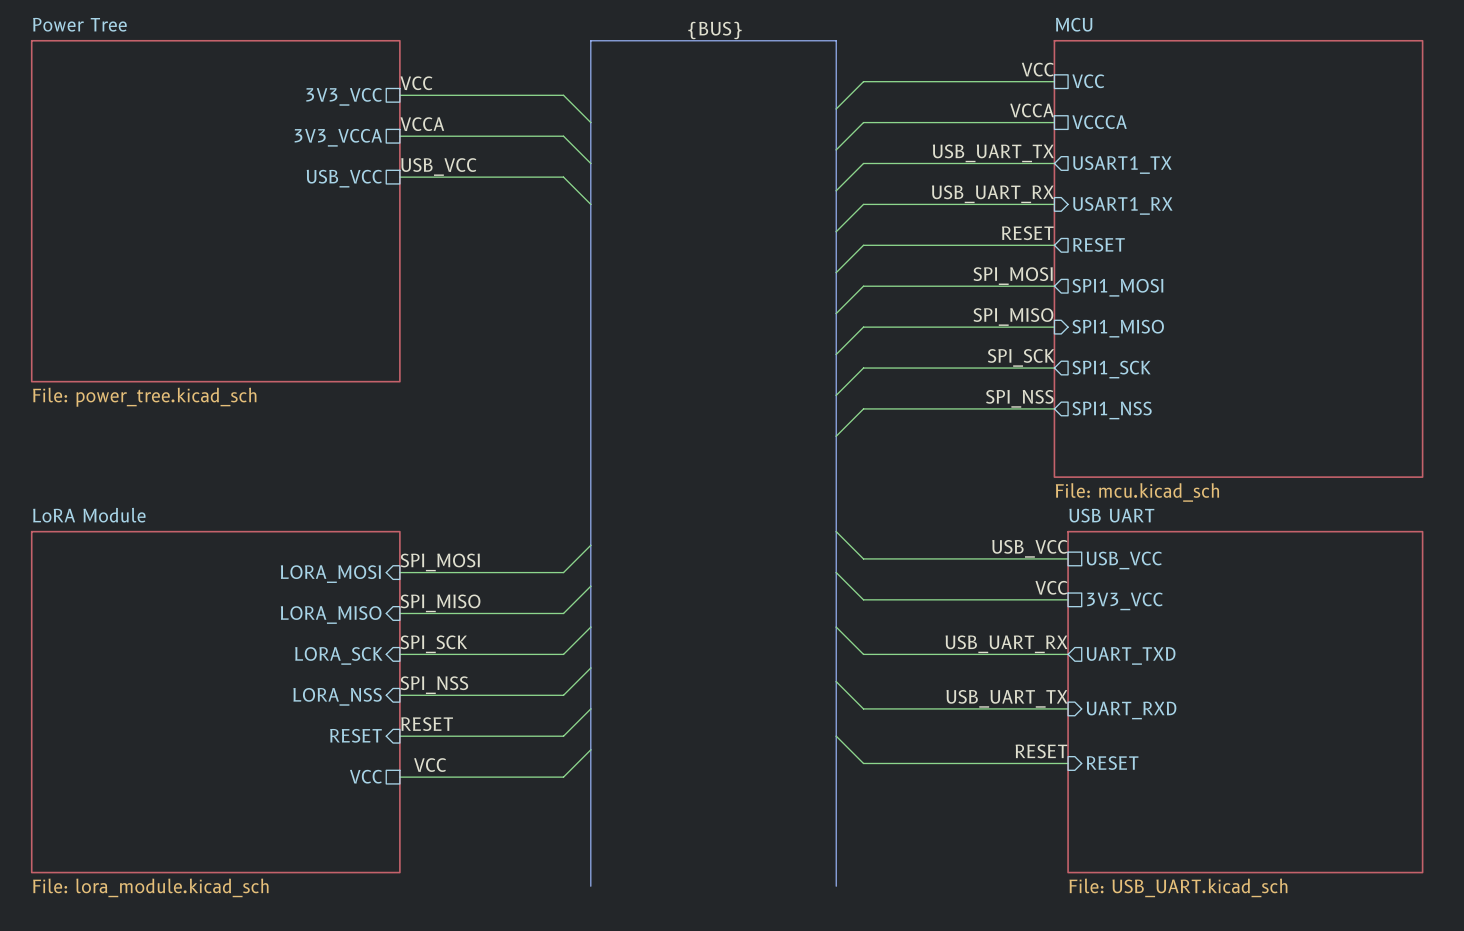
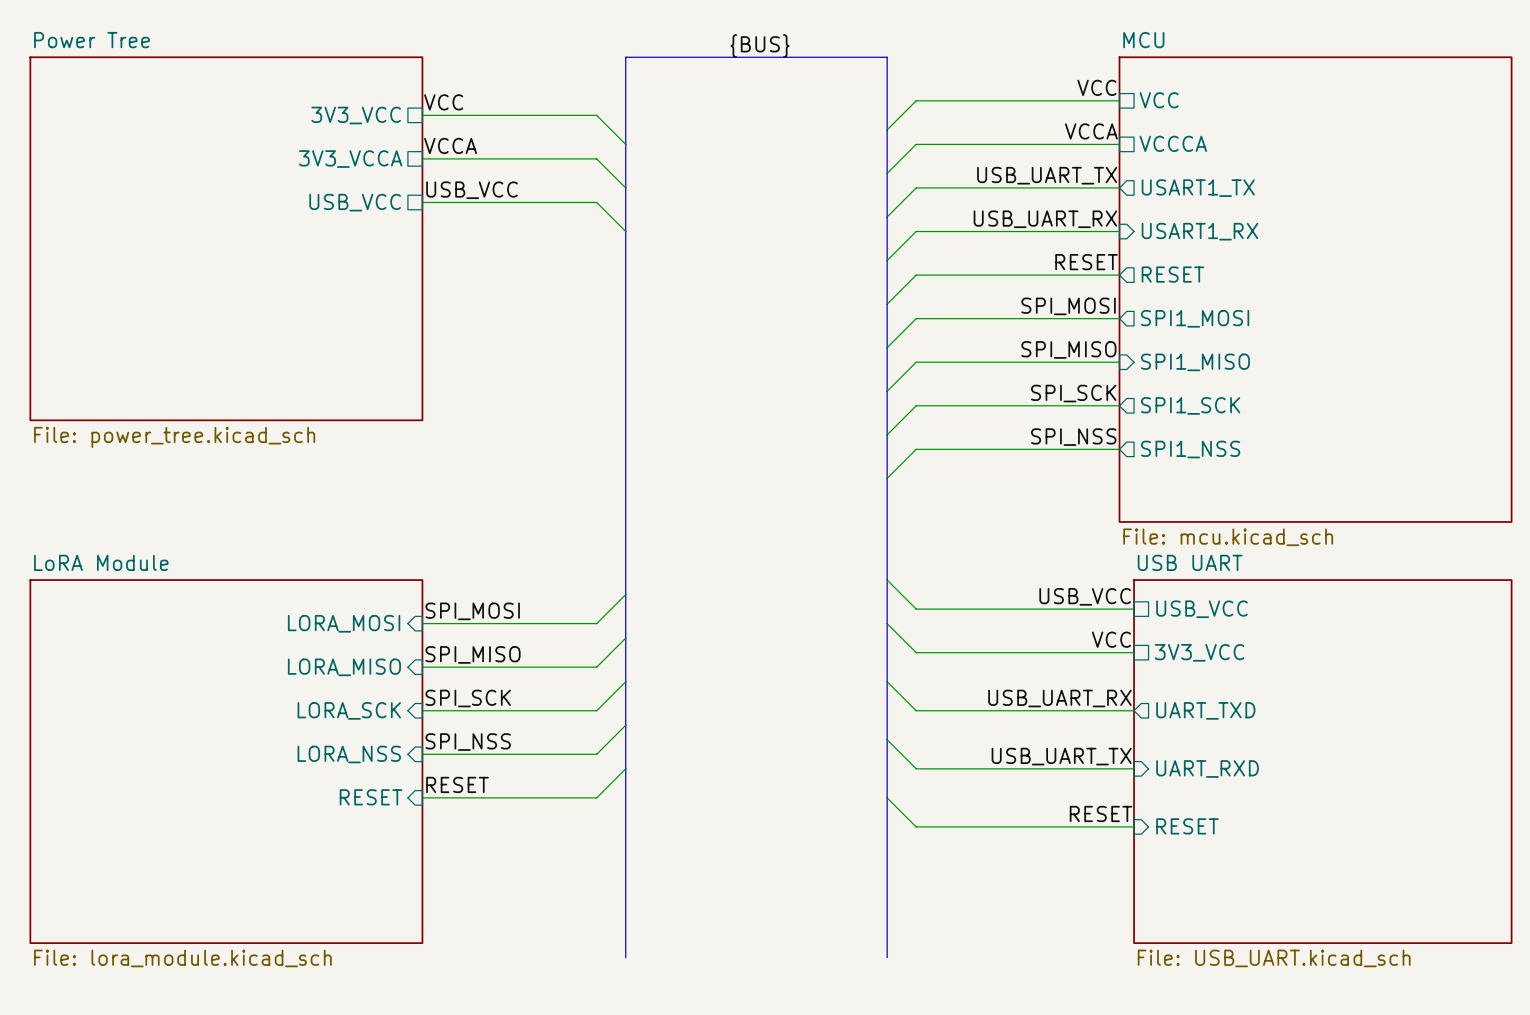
wire: (590, 749) (563, 777) (399, 777) -> none
label: VCC (430, 765) -> none
sheet pin: VCC (365, 776) -> none

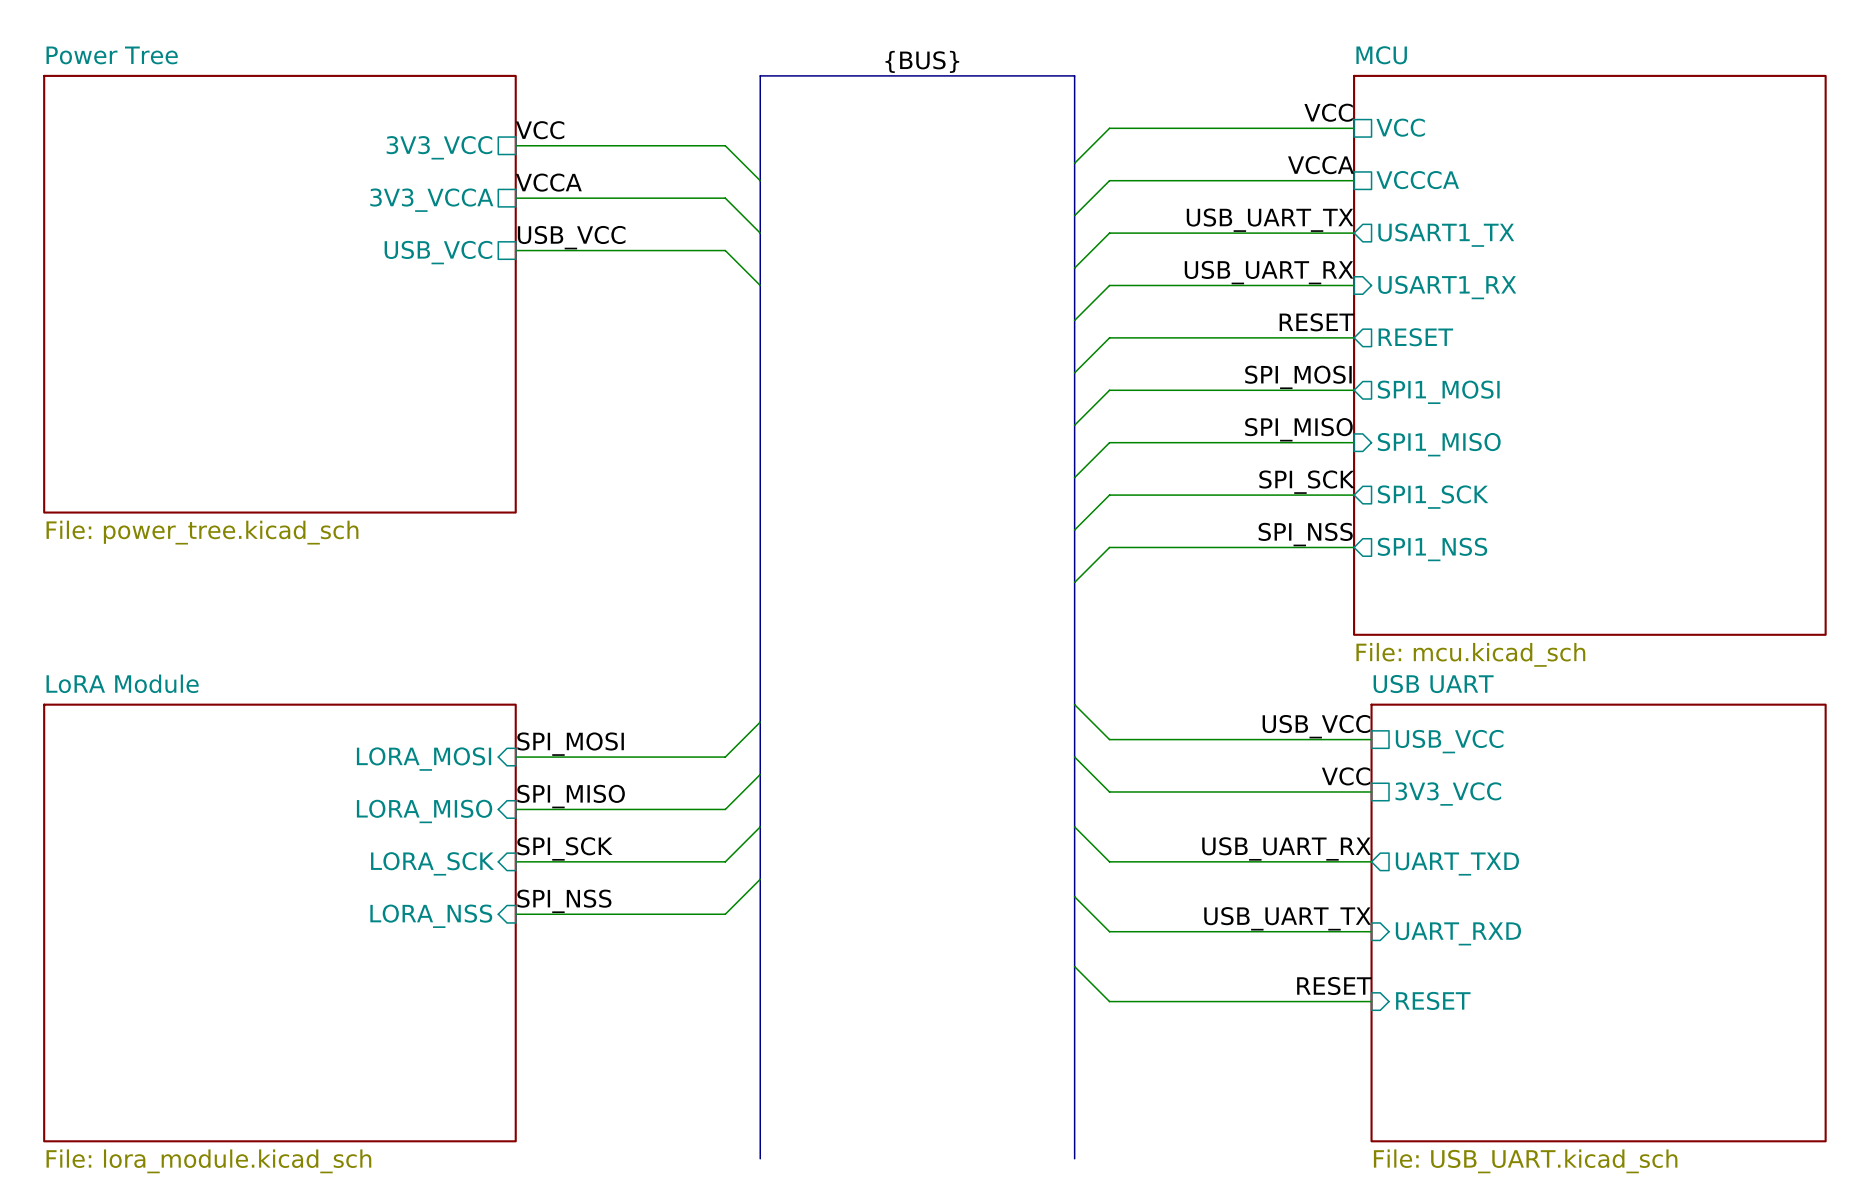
wire: (625, 768) (596, 797) (422, 797) -> none
label: RESET (457, 784) -> none
sheet pin: RESET (371, 797) -> none

